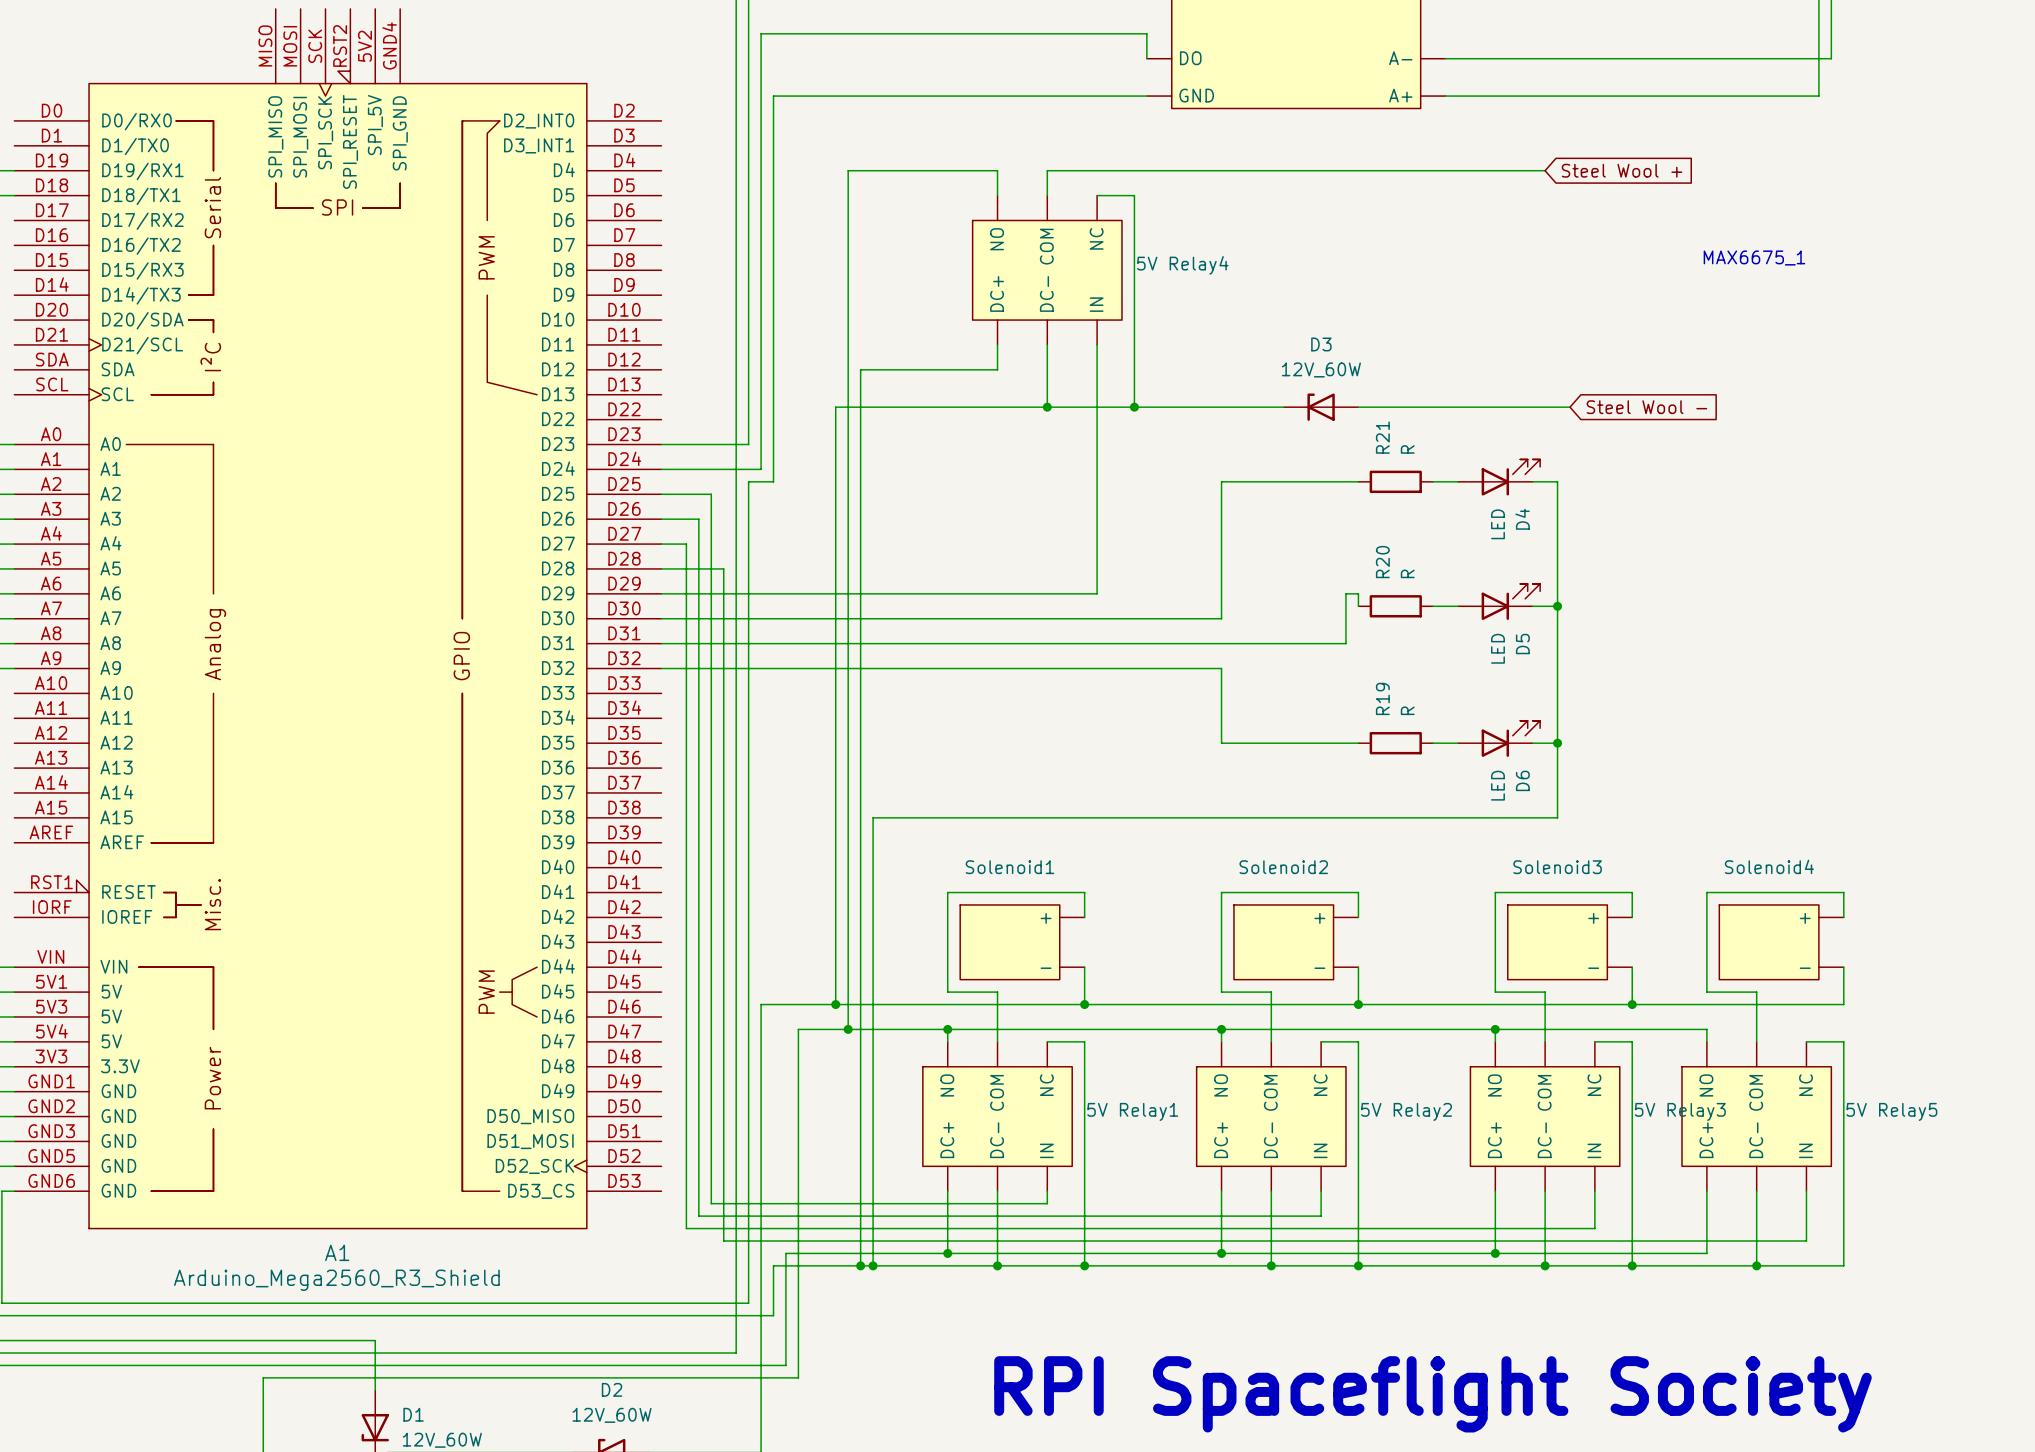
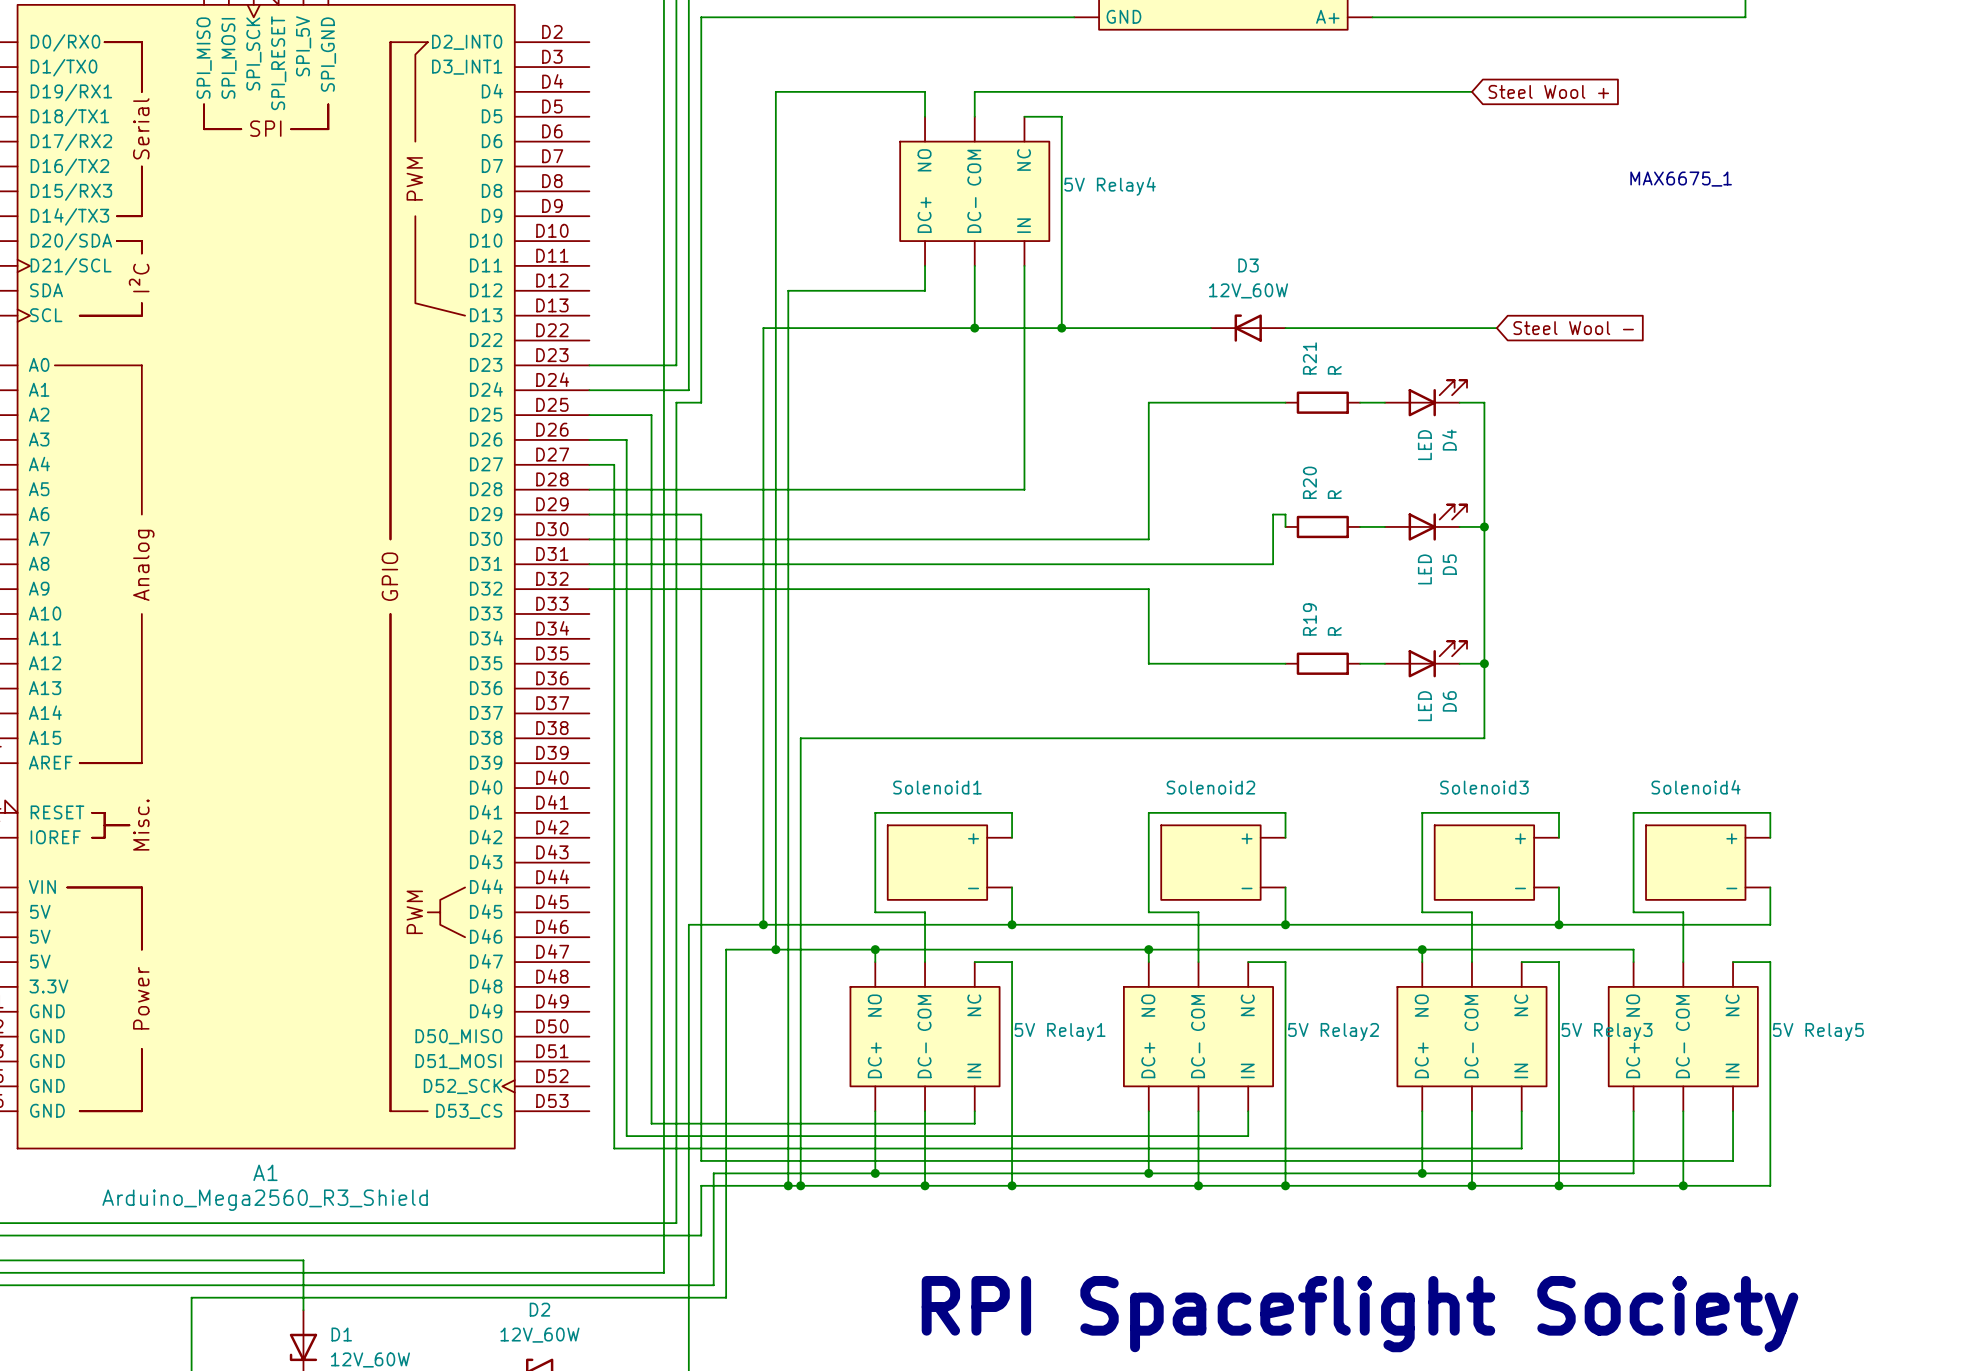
wire: (711, 494) (711, 1203) (723, 1203) (723, 1241) (773, 1241) -> (701, 514) (701, 1160)
wire: (1097, 568) (1097, 593) (773, 593) -> (1024, 489) (651, 489) (651, 415) (639, 415)

